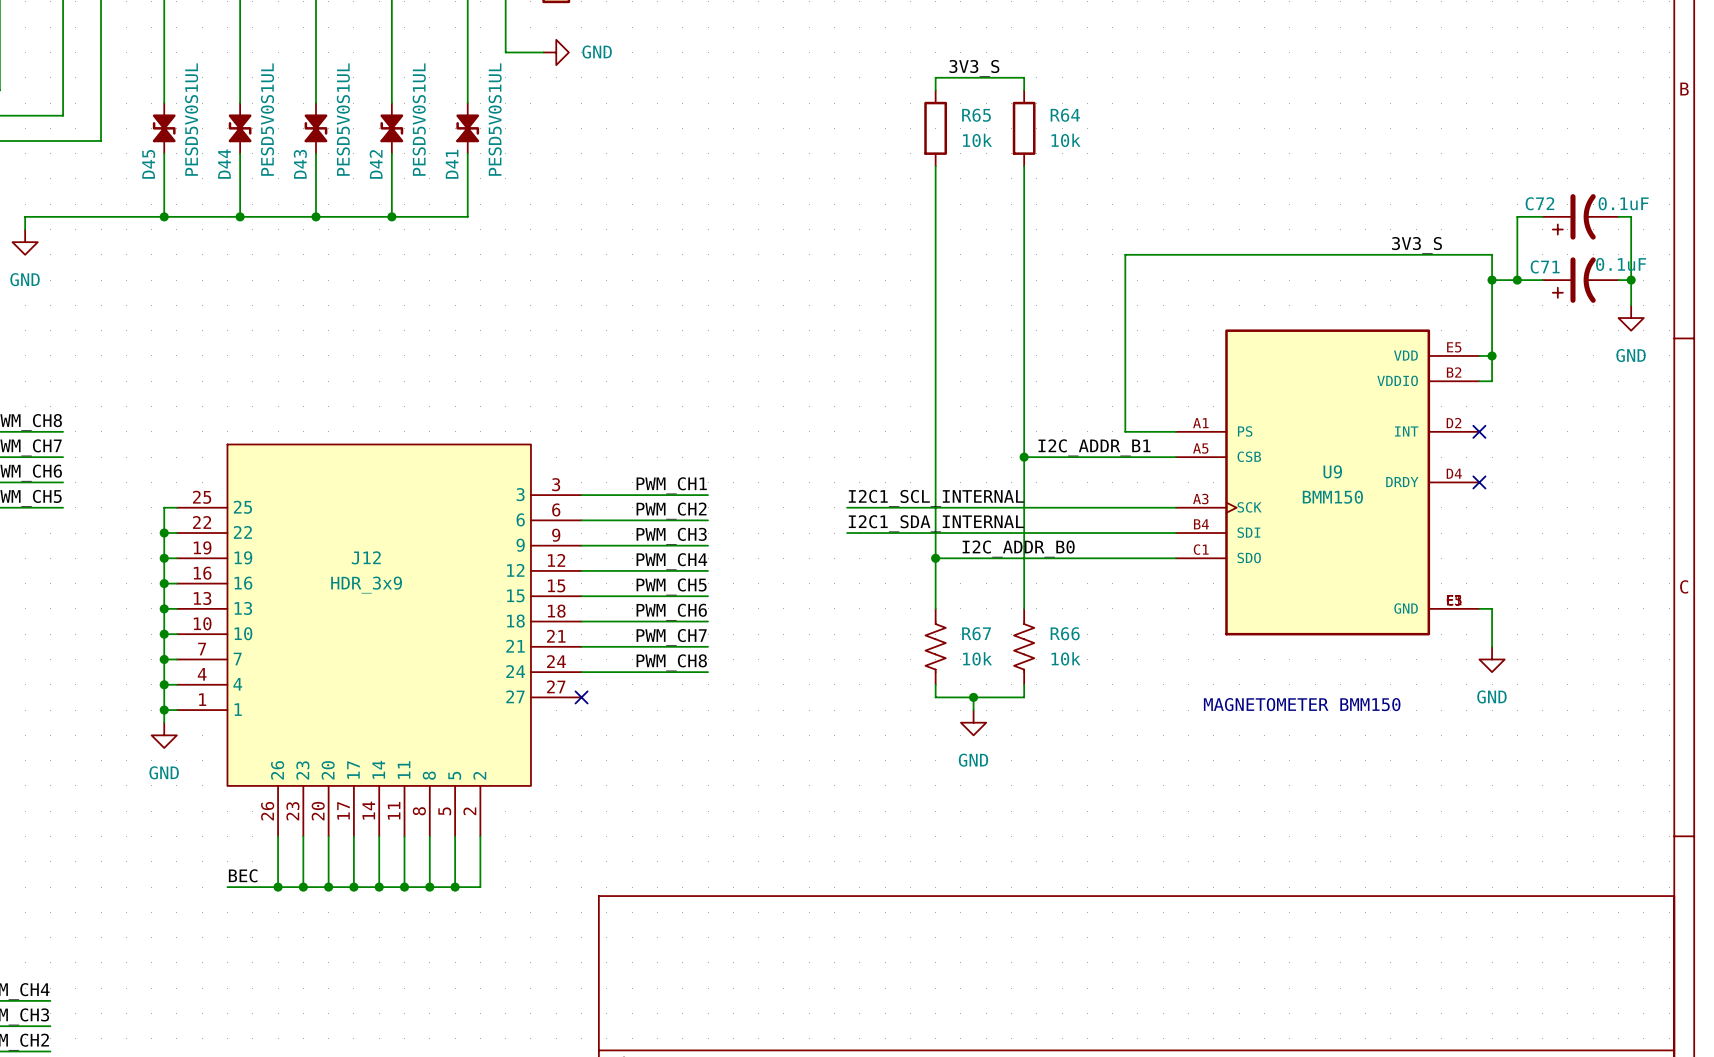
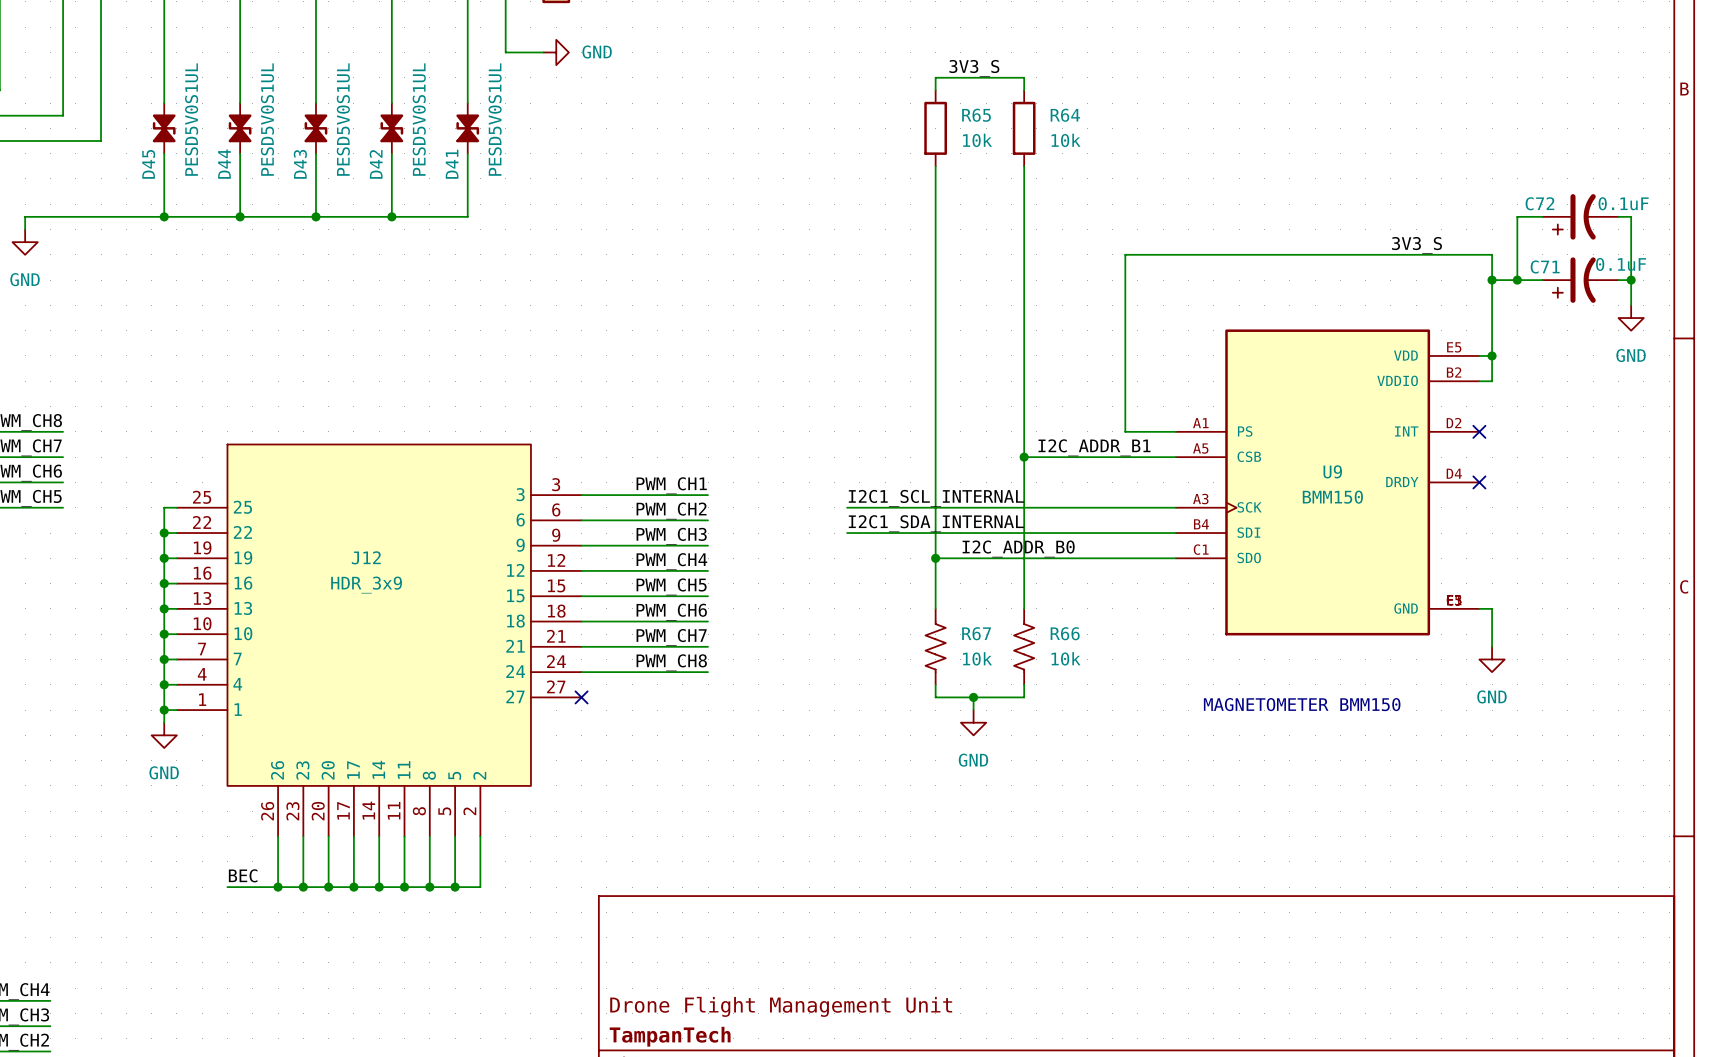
title block: none -> Drone Flight Management Unit (781, 1006)
title block: none -> TampanTech (670, 1036)

